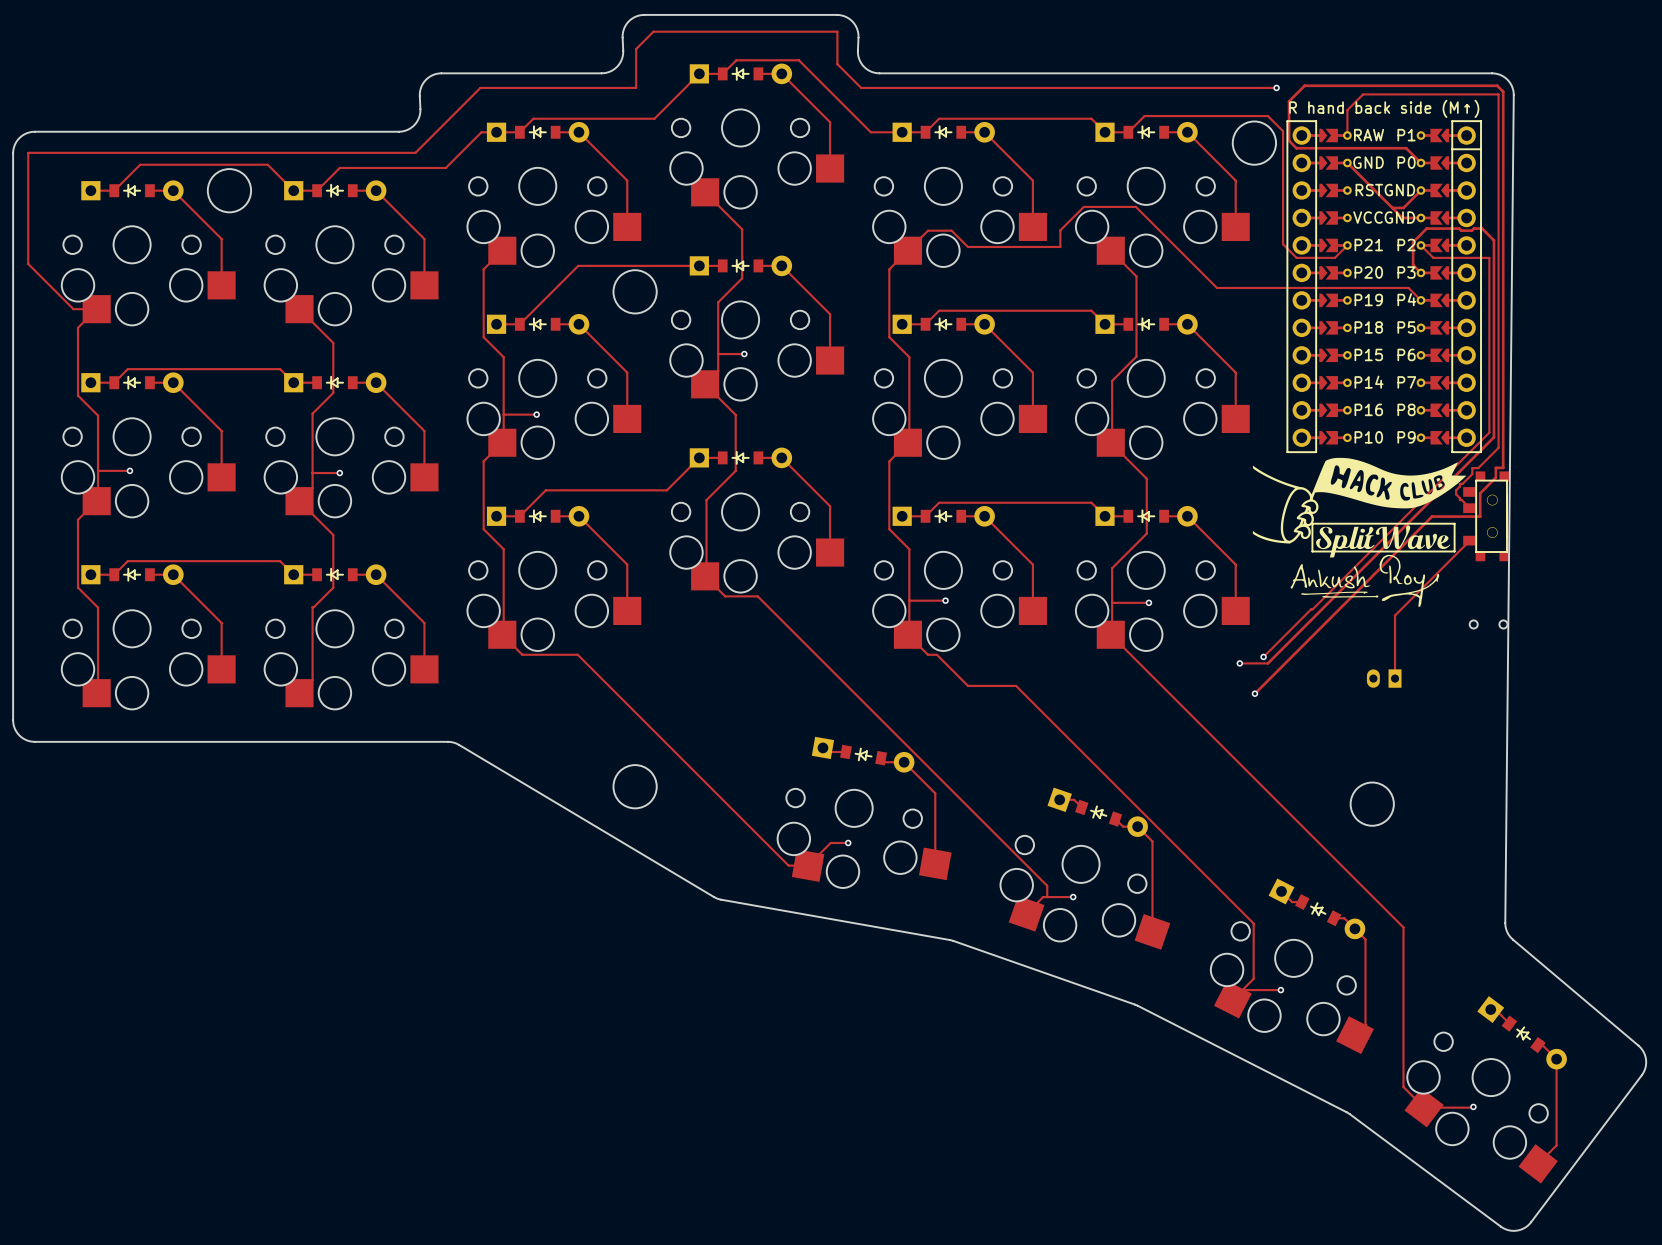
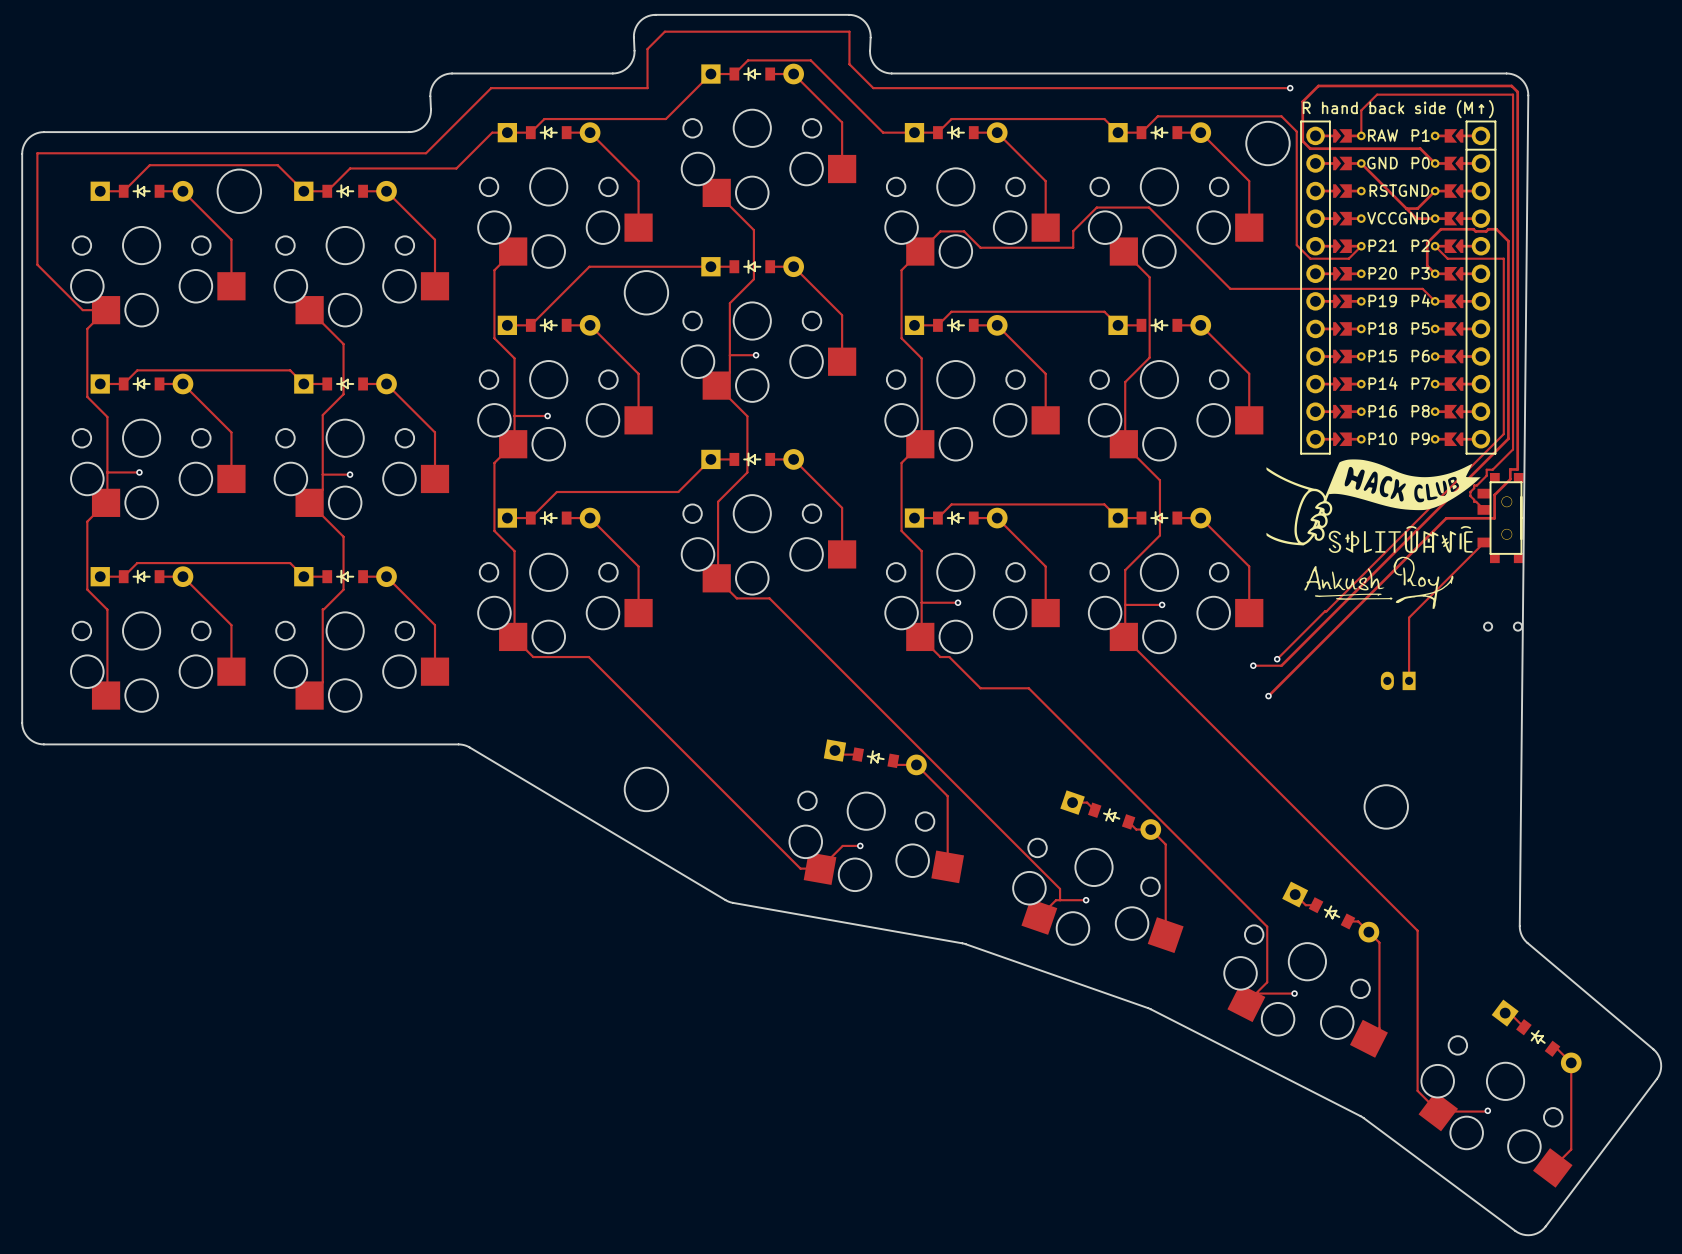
line: (1312, 523) (1454, 523) (1454, 551) (1312, 551) (1312, 523) -> none
drawing: none -> [1375, 526, 1439, 553]
drawing: none -> [1460, 526, 1473, 553]
drawing shape: [1375, 525, 1411, 550] -> [1404, 531, 1419, 553]
drawing: [1316, 526, 1333, 550] -> none
drawing shape: [1329, 526, 1375, 558] -> [1363, 531, 1372, 553]
drawing: none -> [1328, 530, 1360, 553]
drawing: [1360, 528, 1365, 533] -> none
drawing shape: [1425, 533, 1438, 550] -> [1441, 530, 1457, 553]
drawing: [1407, 535, 1426, 550] -> none
drawing shape: [1437, 535, 1451, 549] -> [1459, 533, 1462, 550]

